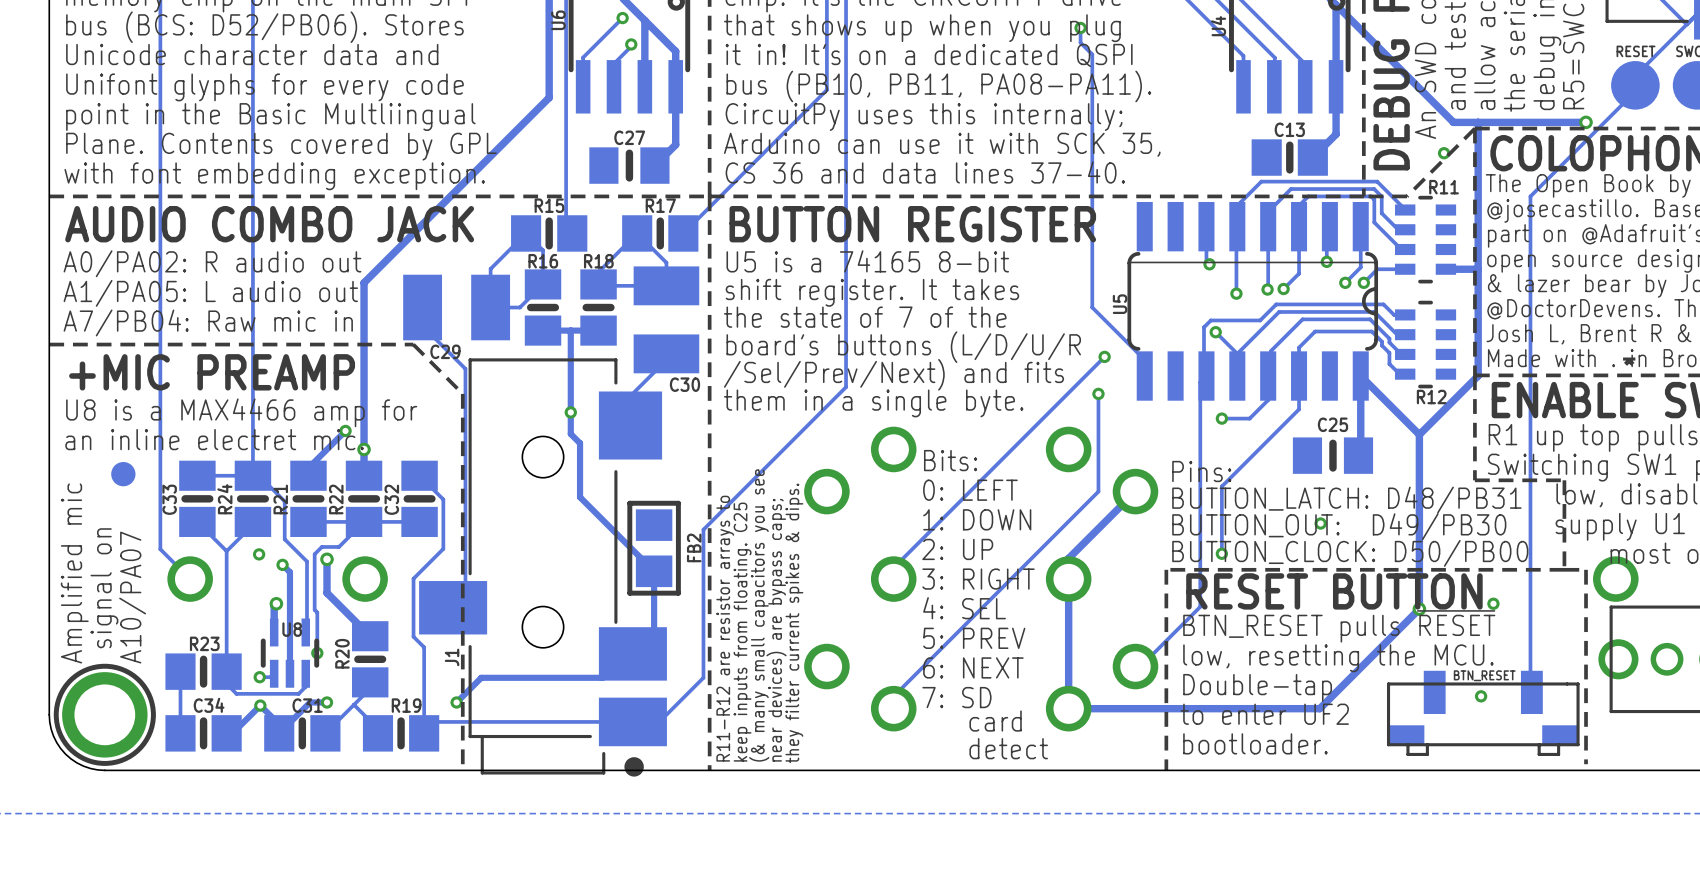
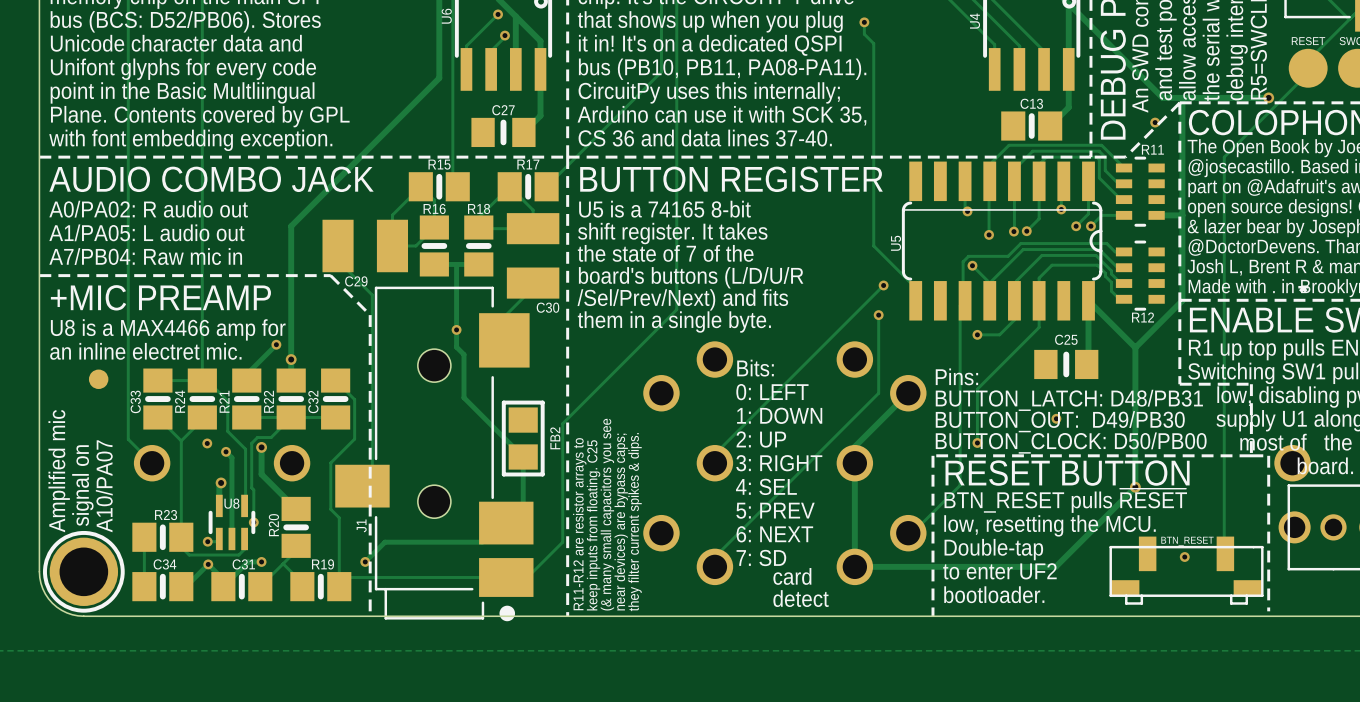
via: (1493, 603) -> none

